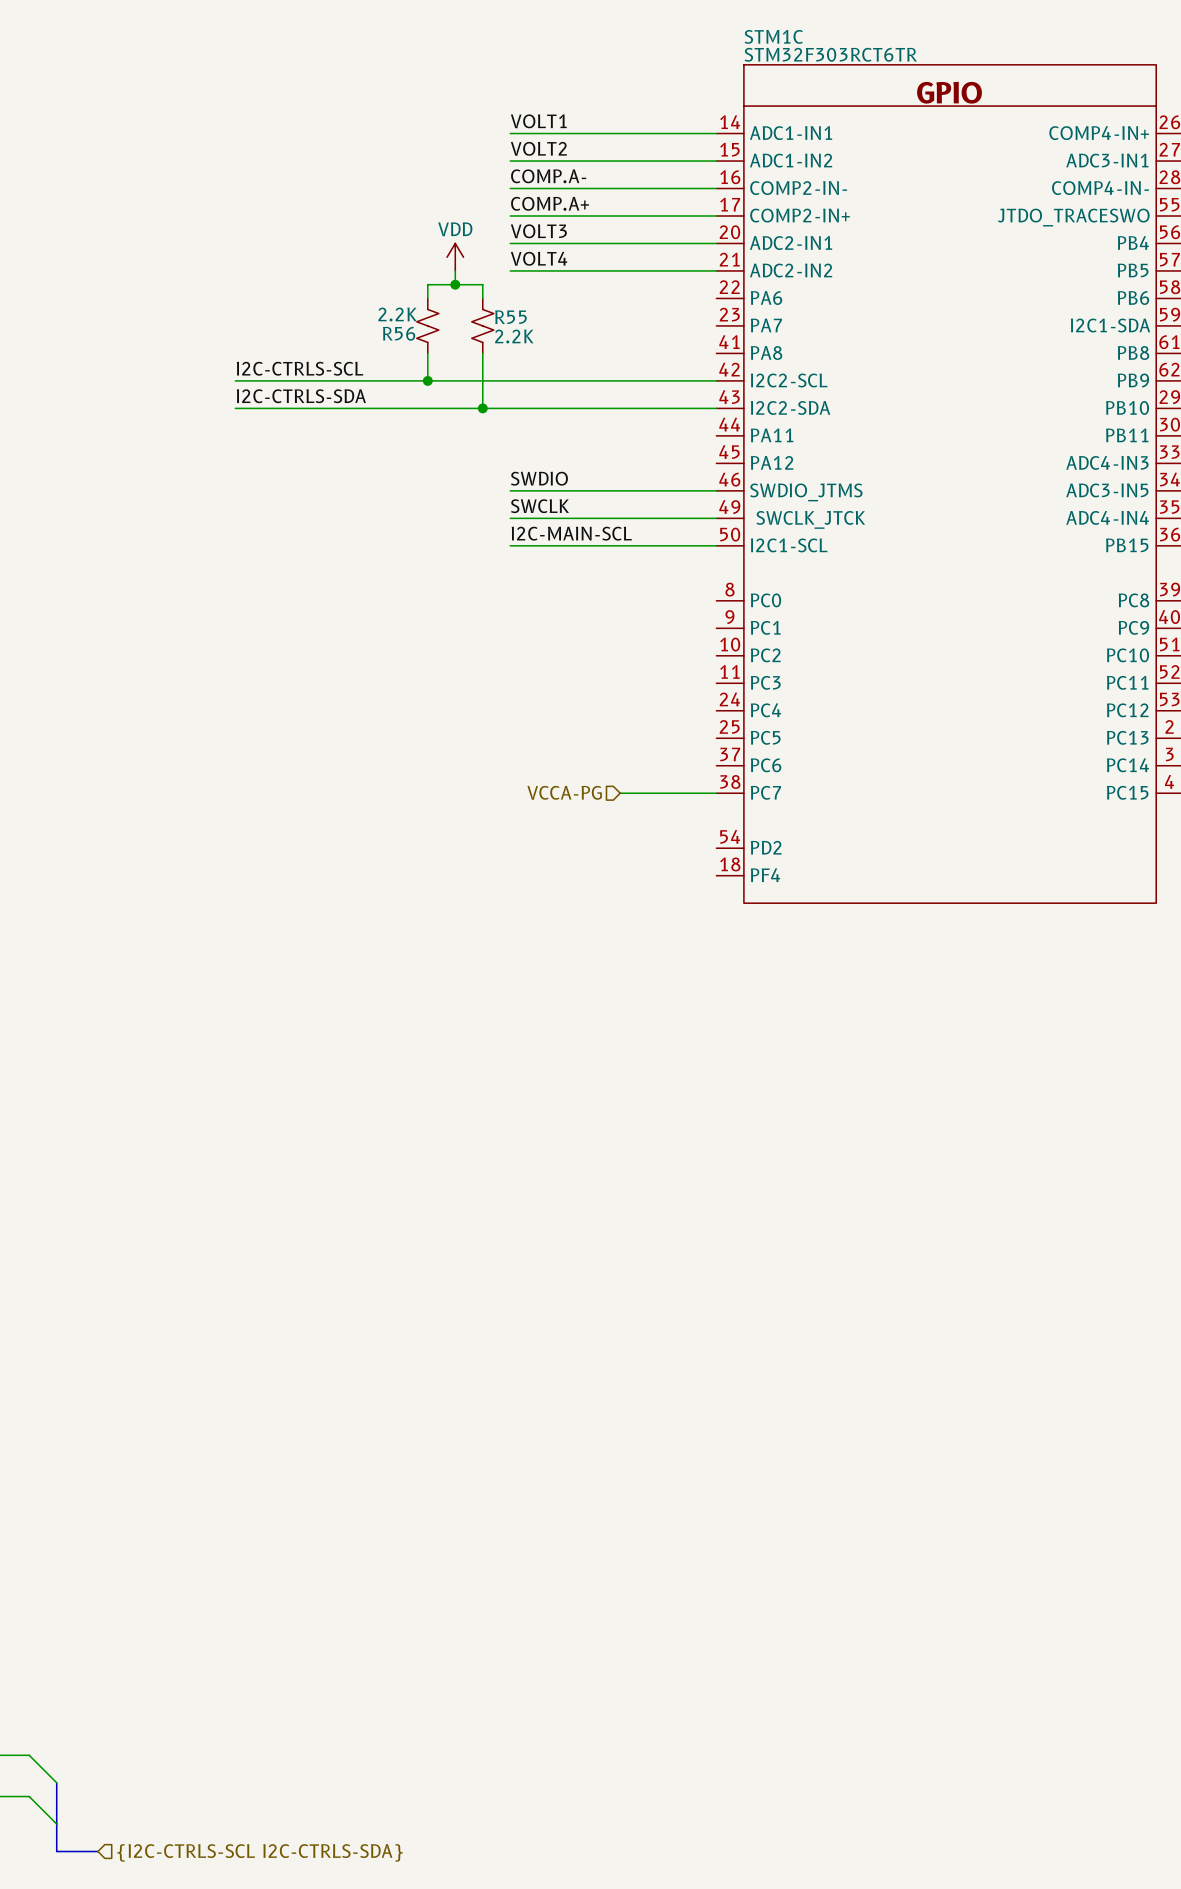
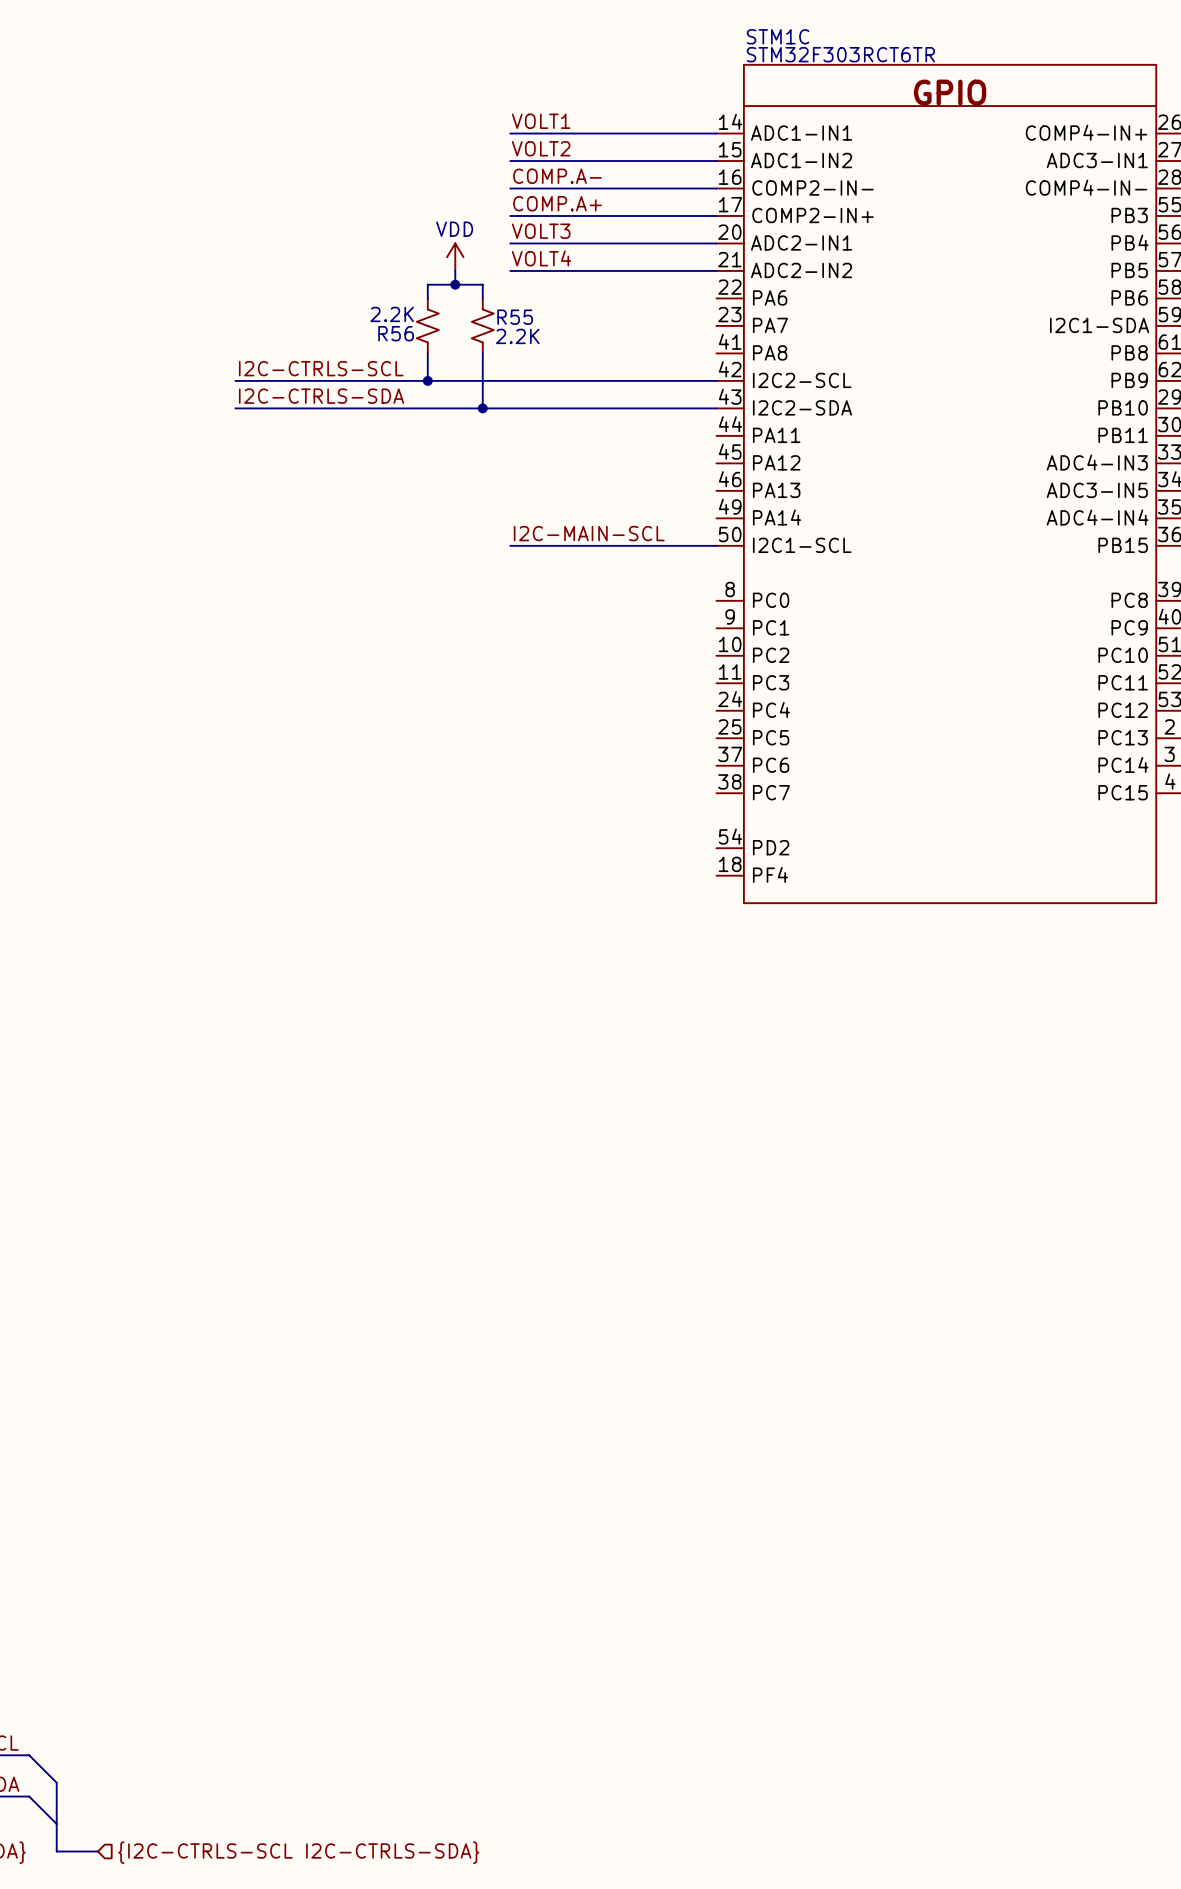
STM1C pin name: JTDO_TRACESWO (1073, 217) -> PB3 (1129, 215)
label: SWDIO (539, 478) -> none
wire: (510, 490) (716, 490) -> none
STM1C pin name: SWDIO_JTMS (806, 492) -> PA13 (776, 490)
label: SWCLK (539, 506) -> none
wire: (510, 518) (716, 518) -> none
STM1C pin name: SWCLK_JTCK (810, 519) -> PA14 (777, 517)
hierarchical label: VCCA-PG (564, 792) -> none
wire: (620, 793) (716, 793) -> none

